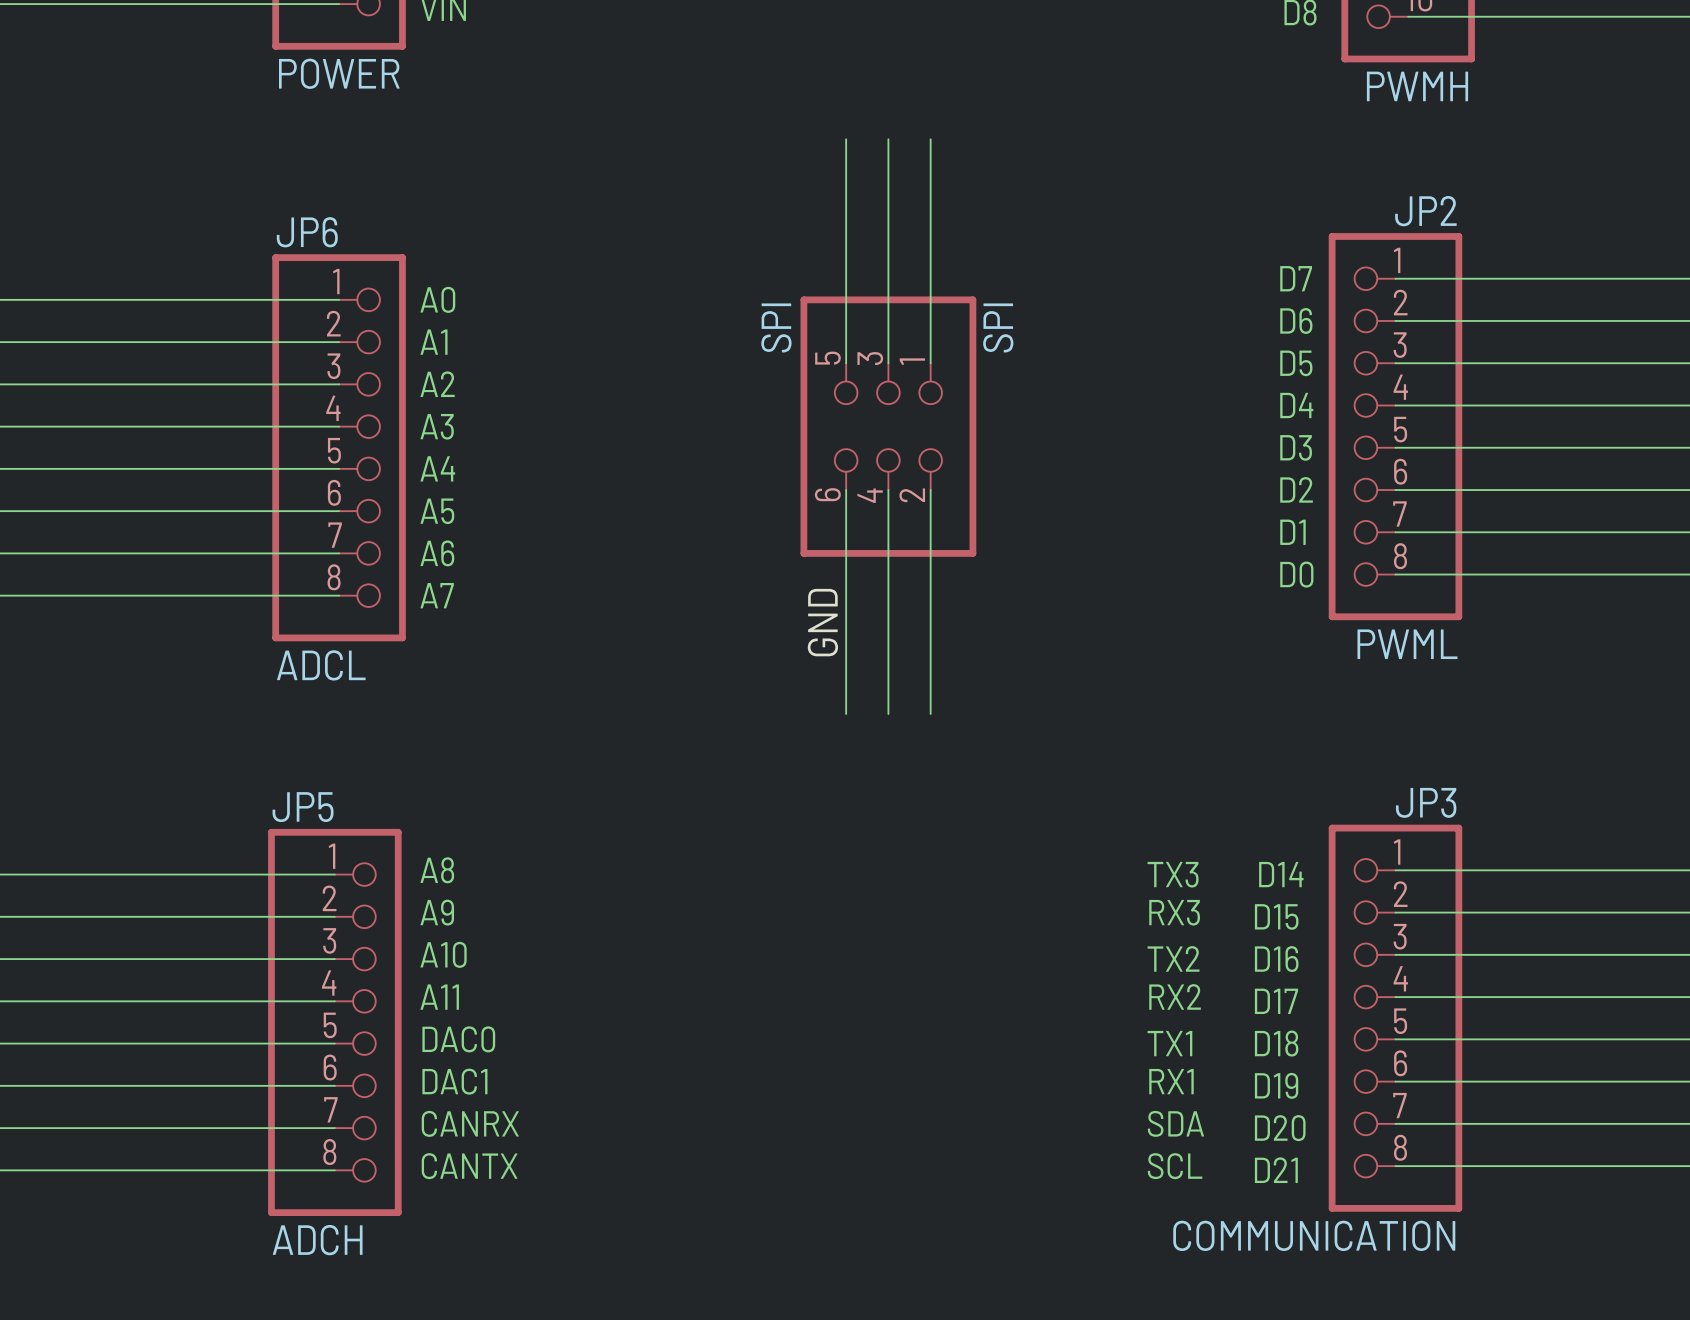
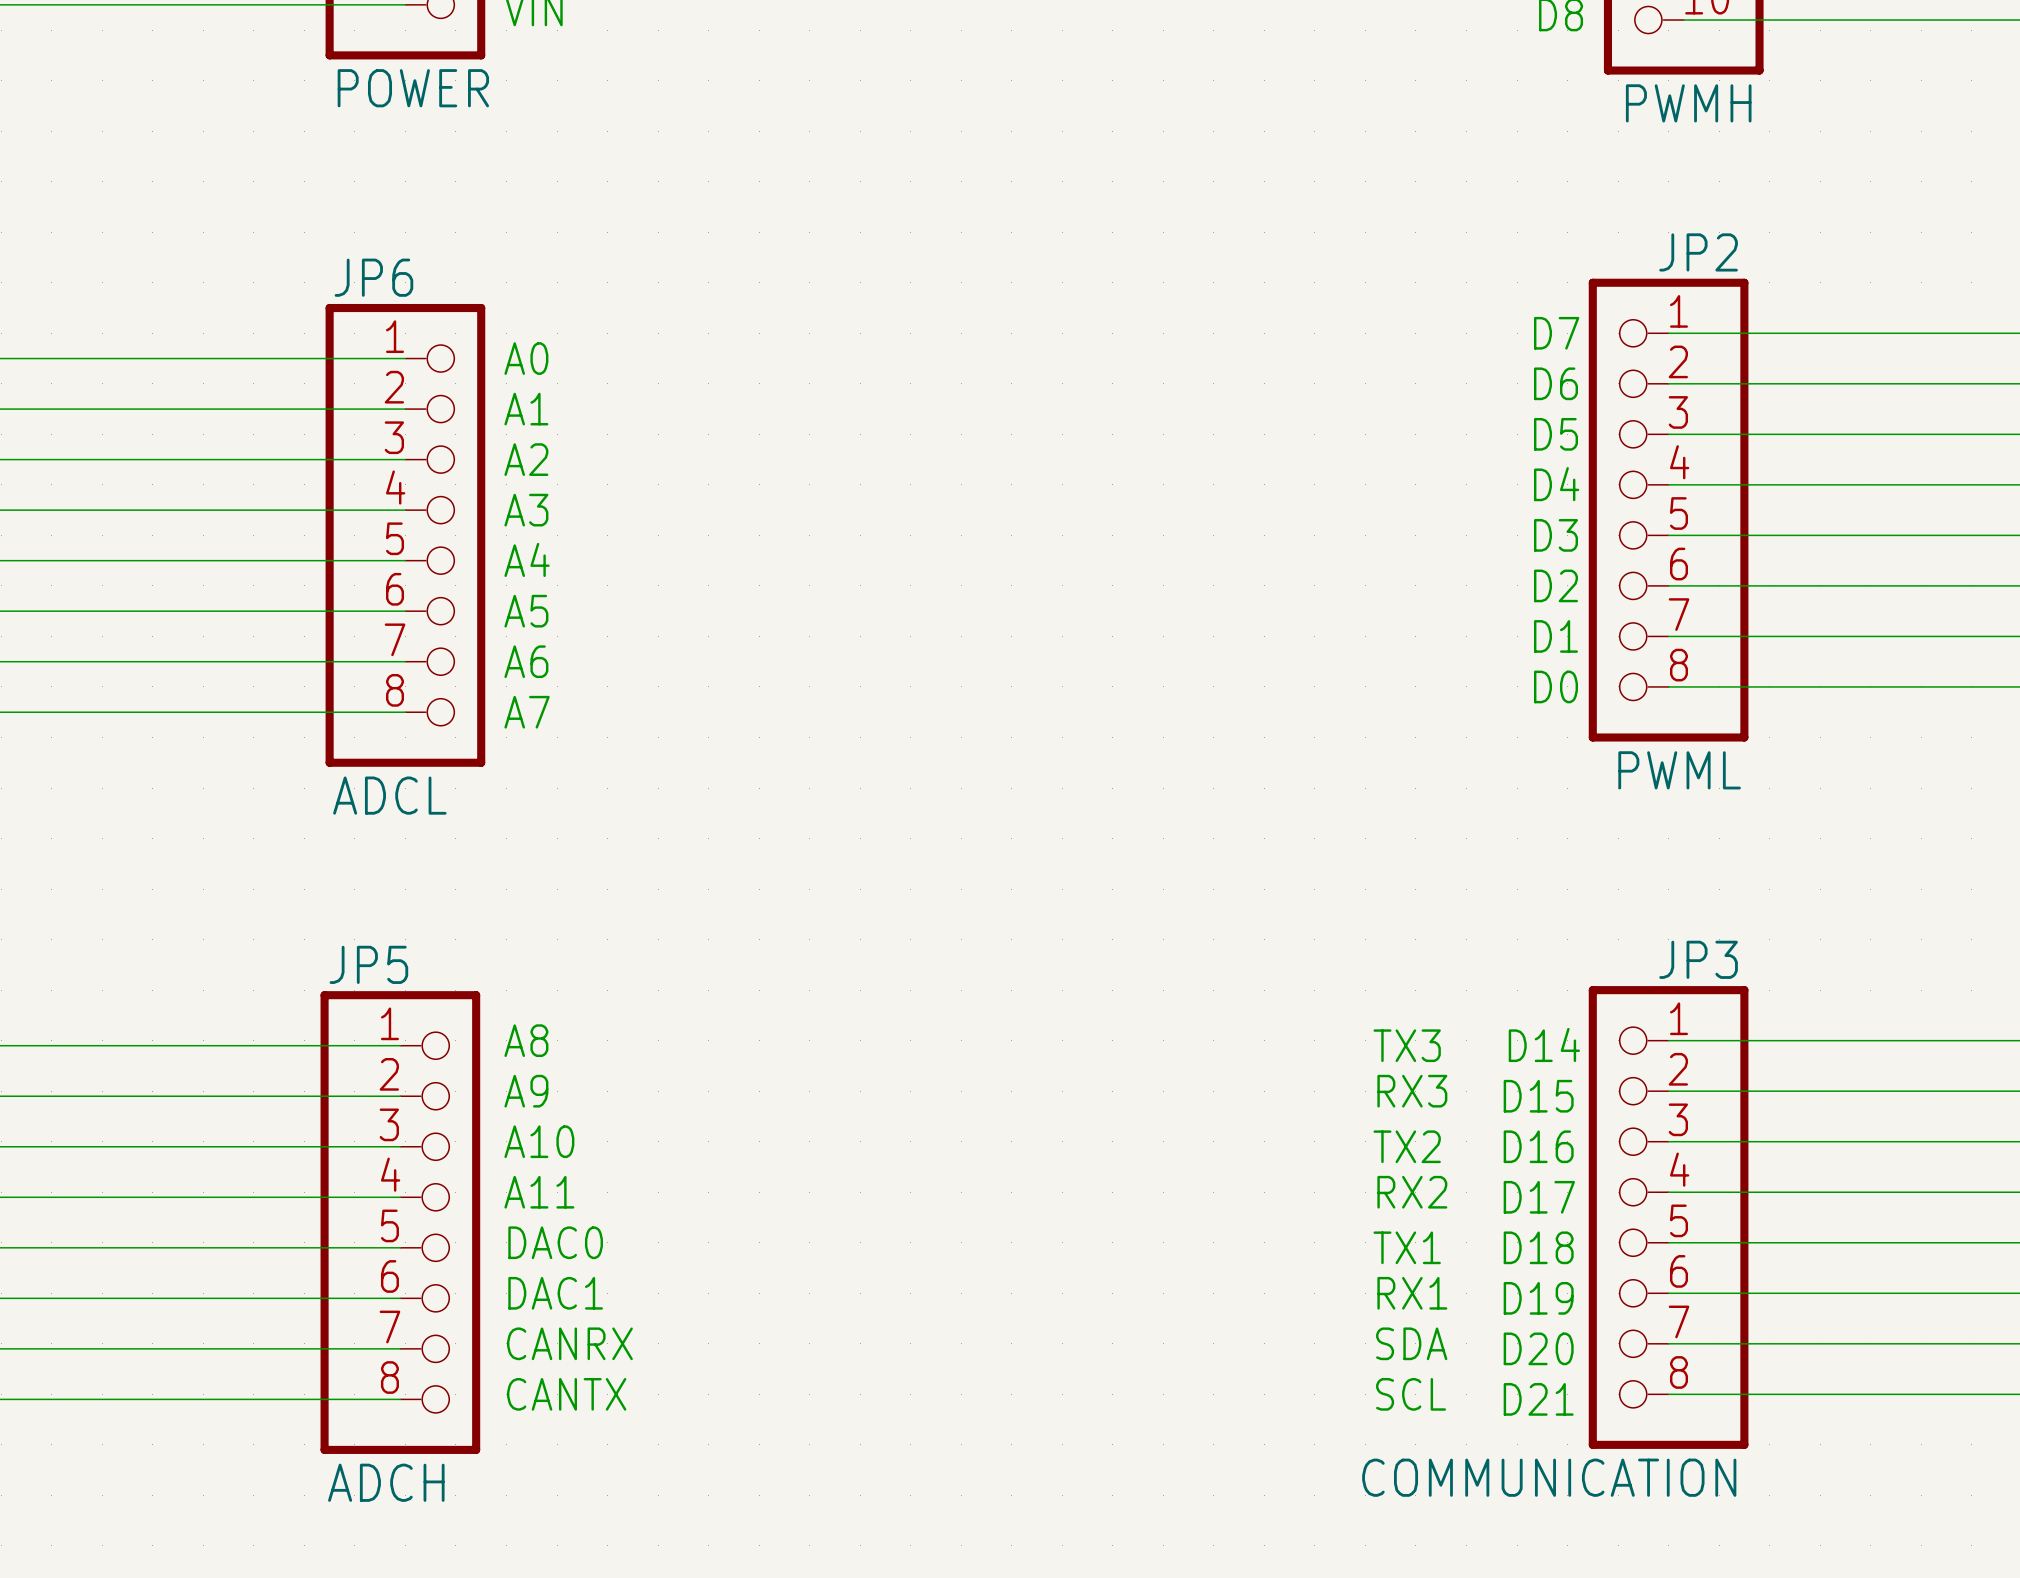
wire: (846, 139) (846, 363) -> none
wire: (888, 139) (888, 363) -> none
wire: (930, 139) (930, 363) -> none
SPI: SPI (888, 426) -> none
wire: (846, 490) (846, 713) -> none
wire: (888, 490) (888, 713) -> none
wire: (930, 490) (930, 713) -> none
label: GND (822, 622) -> none

